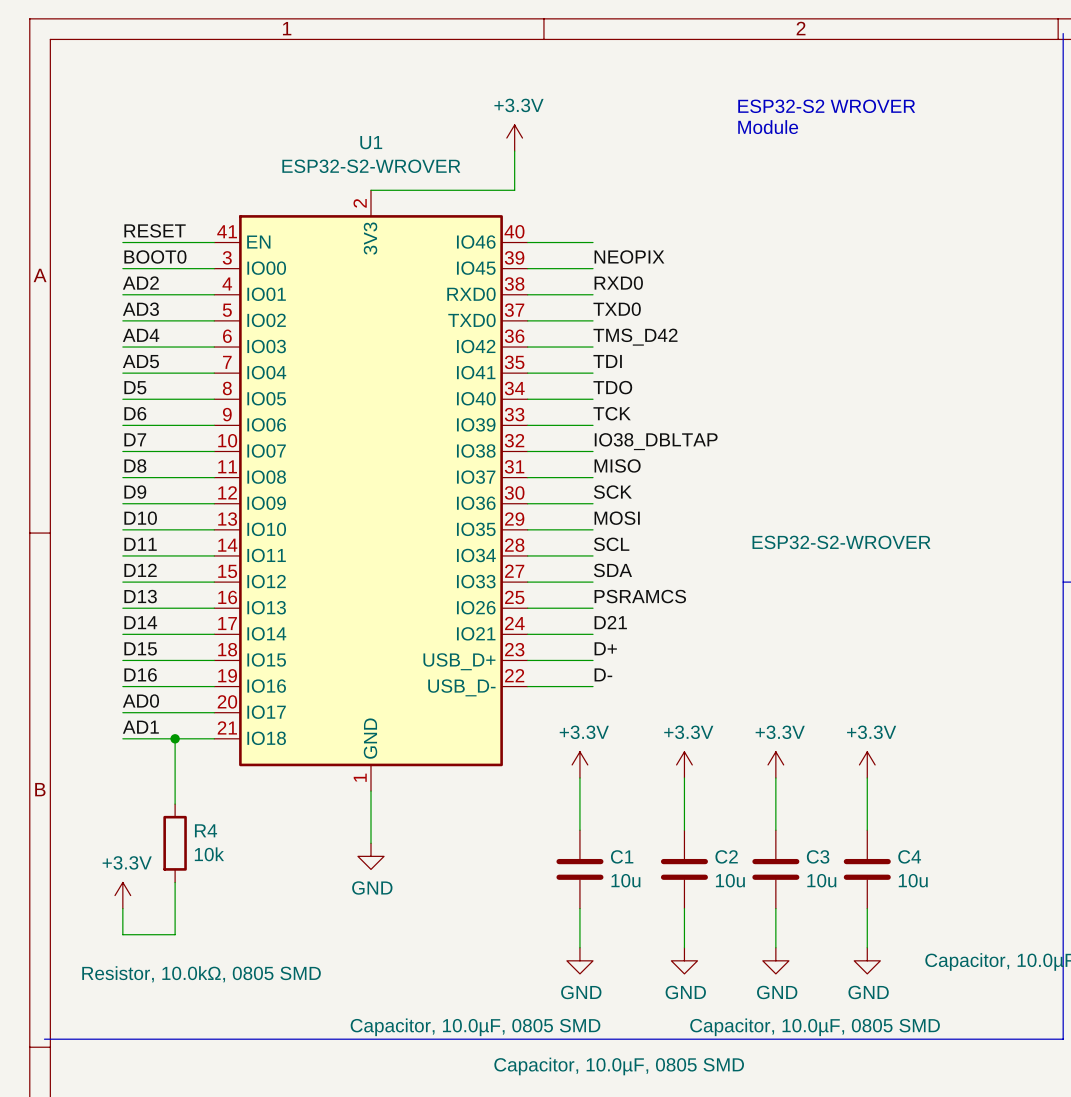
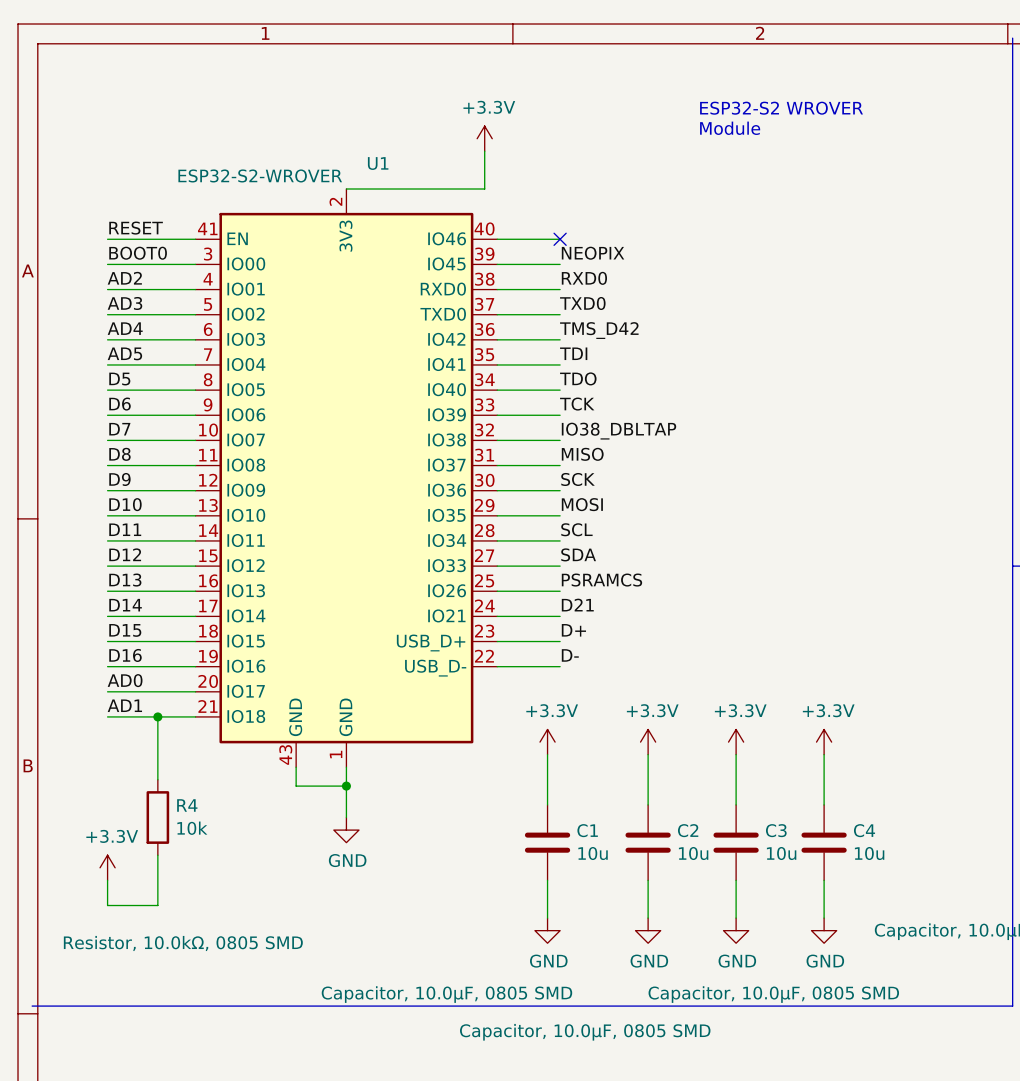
U1 name position: U1 (371, 142) -> U1 (378, 163)
U1 value position: ESP32-S2-WROVER (371, 166) -> ESP32-S2-WROVER (260, 175)
U1 symbol: [214, 190, 528, 792] -> [195, 189, 498, 768]
no-connect mark: none -> (560, 239)
U1 text: ESP32-S2-WROVER (841, 542) -> none
wire: none -> (296, 767) (296, 786) (346, 786)
junction: none -> (346, 786)

